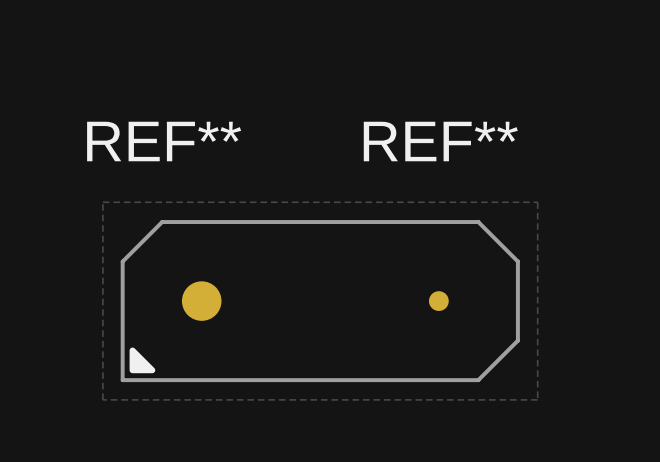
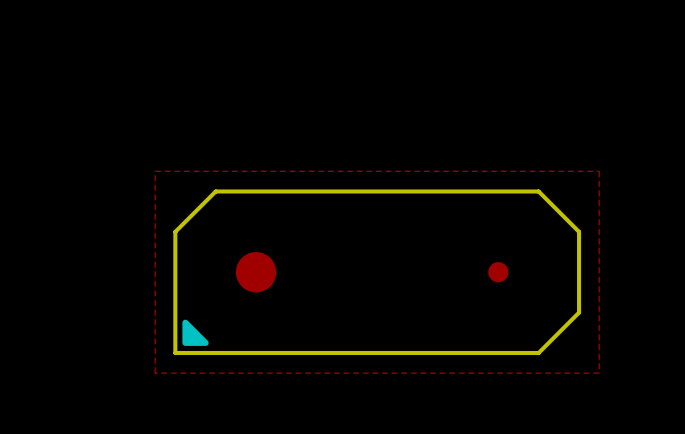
REF** name: REF** (164, 141) -> none
REF** name: REF** (440, 141) -> none

